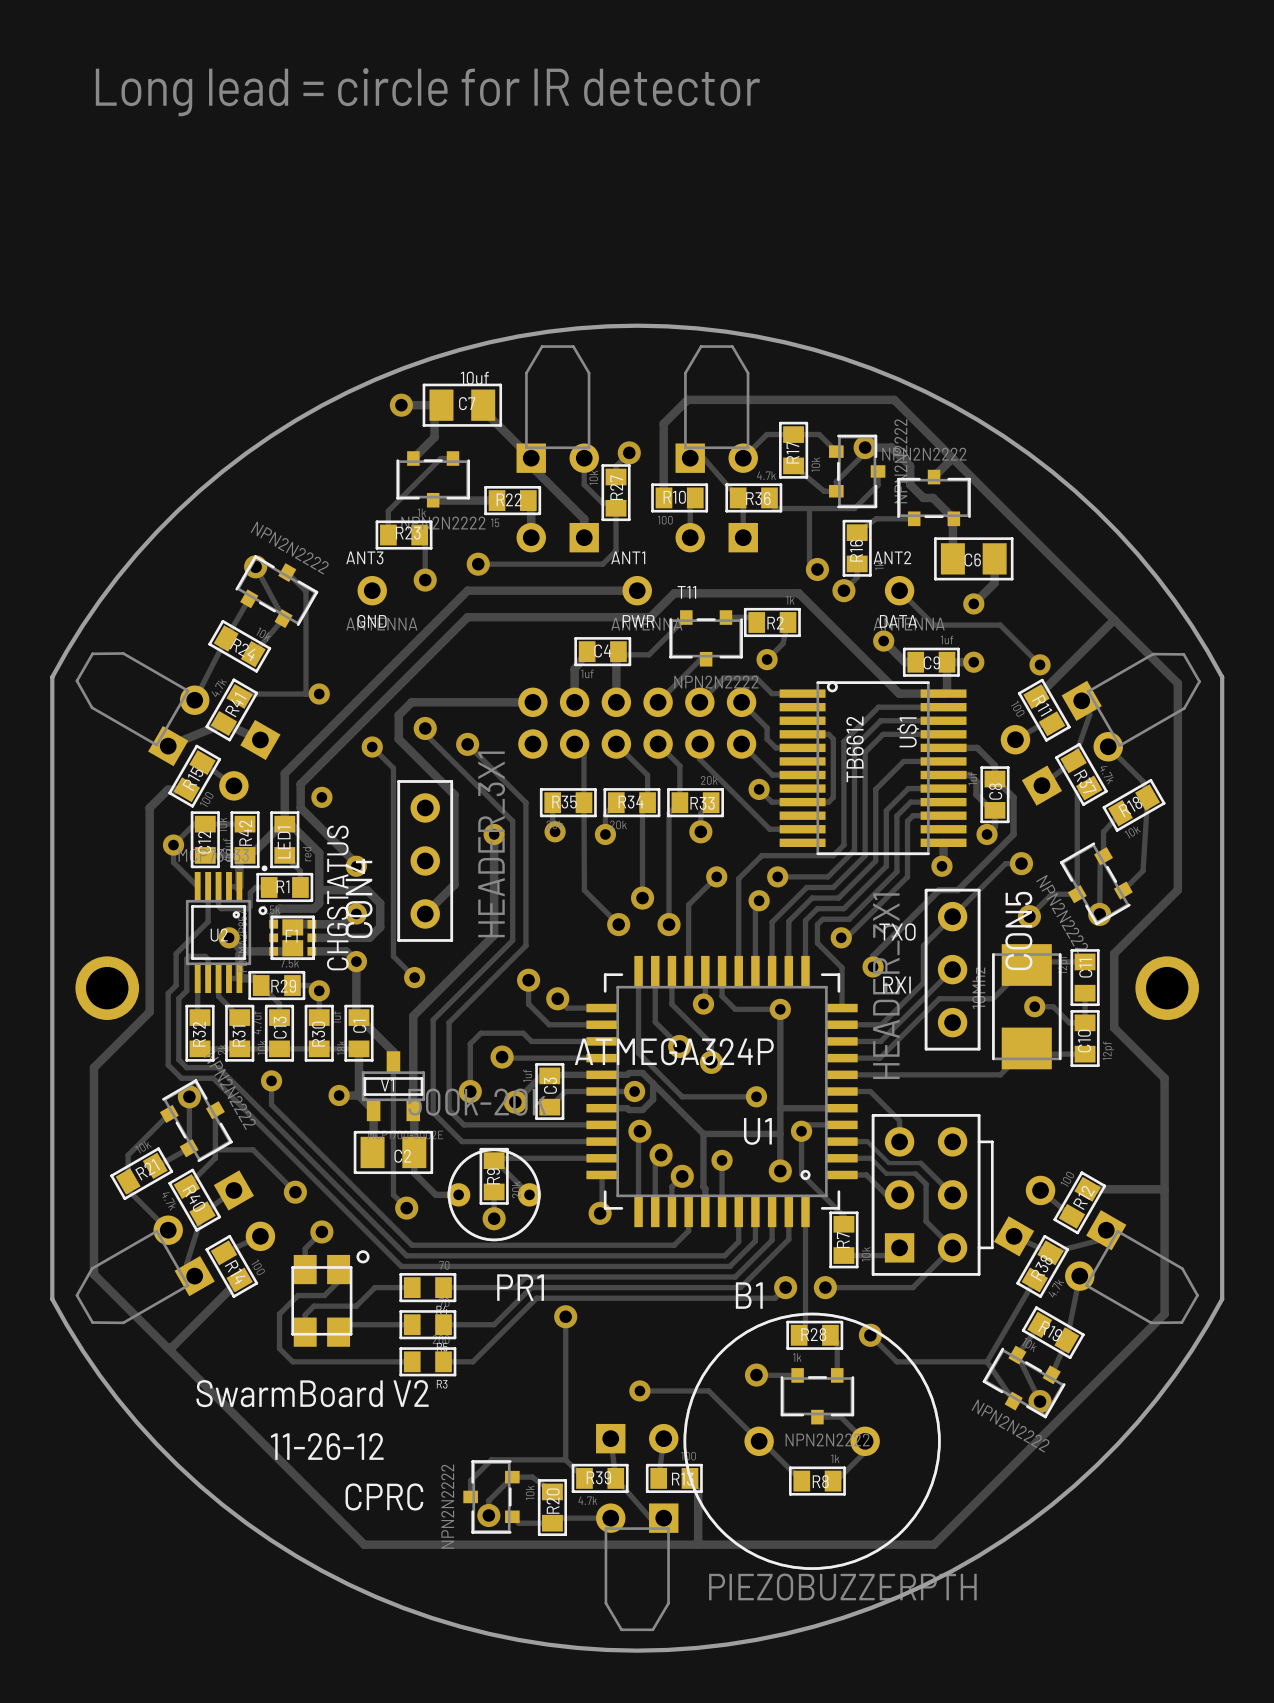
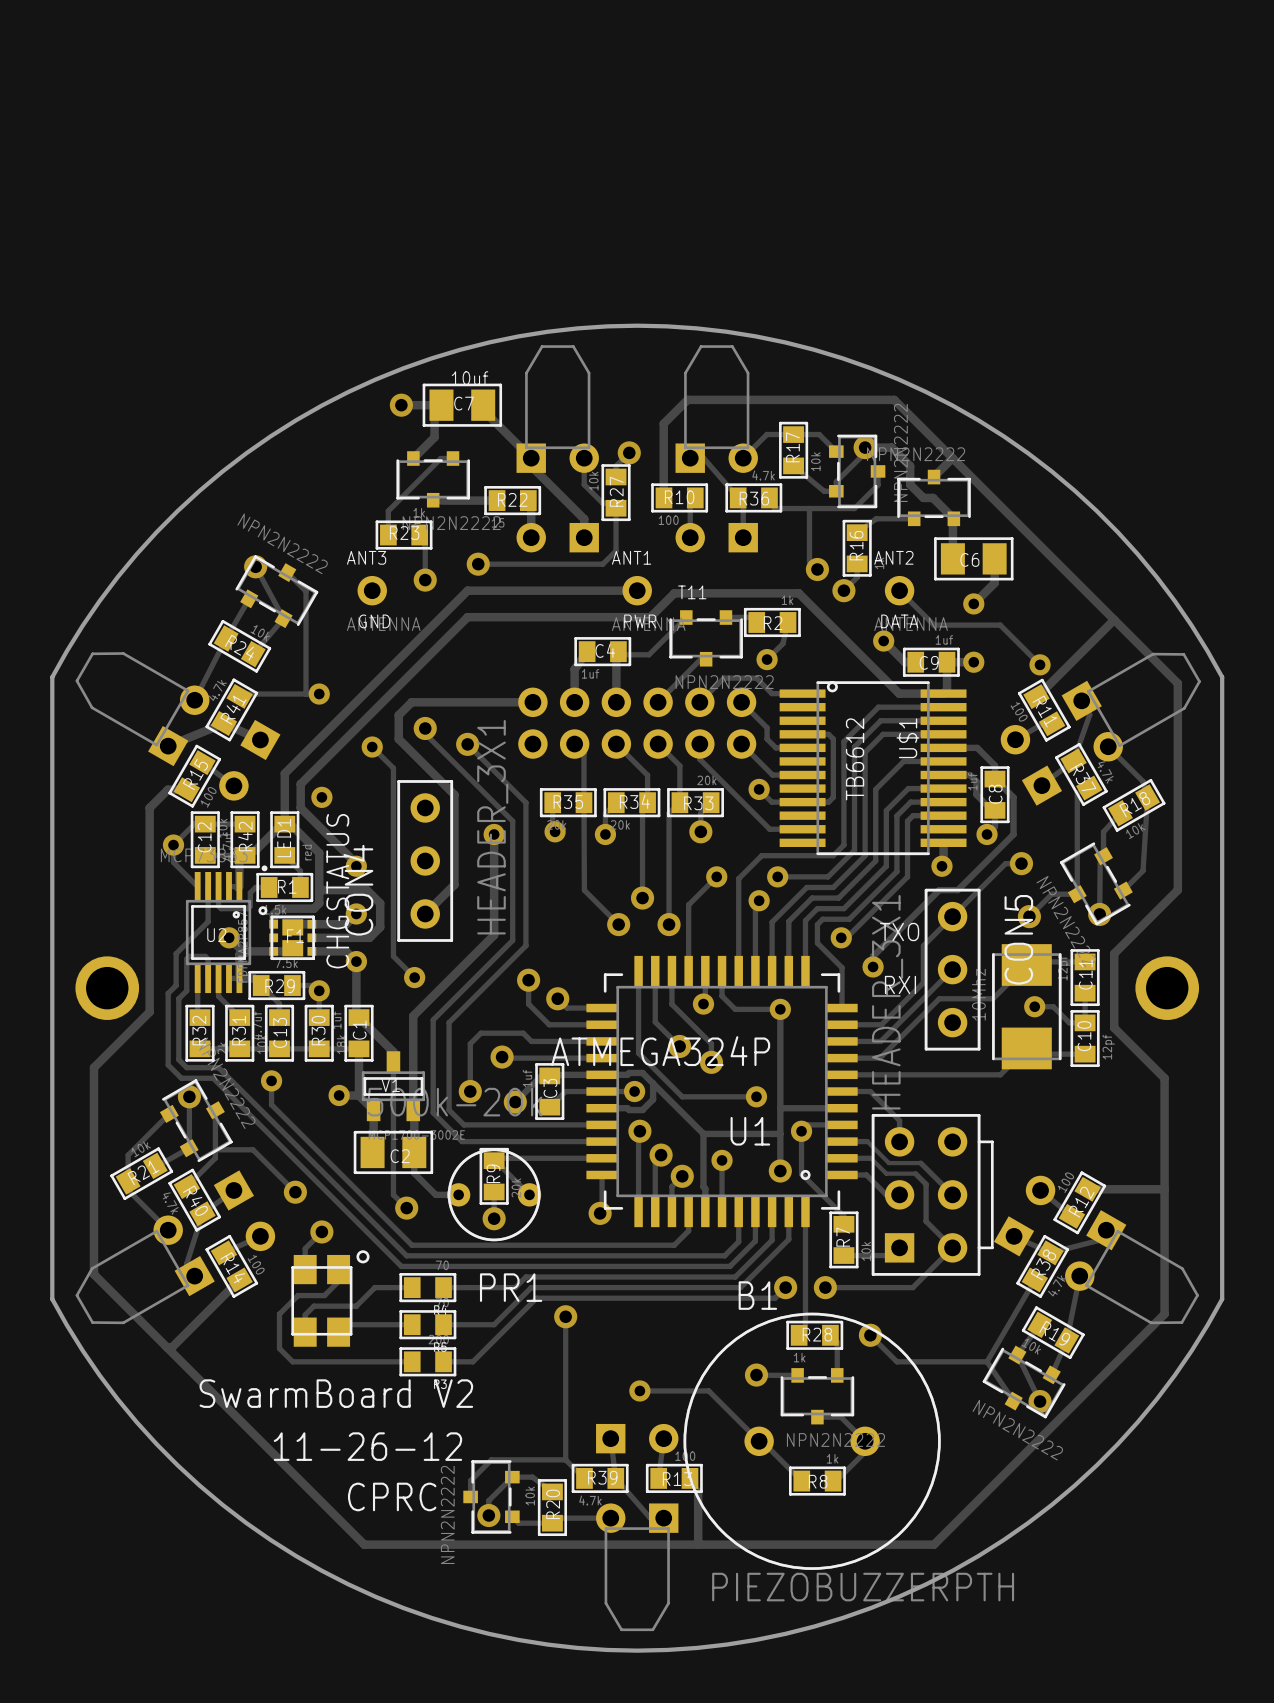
text: Long lead = circle for IR detector (427, 92) -> none

